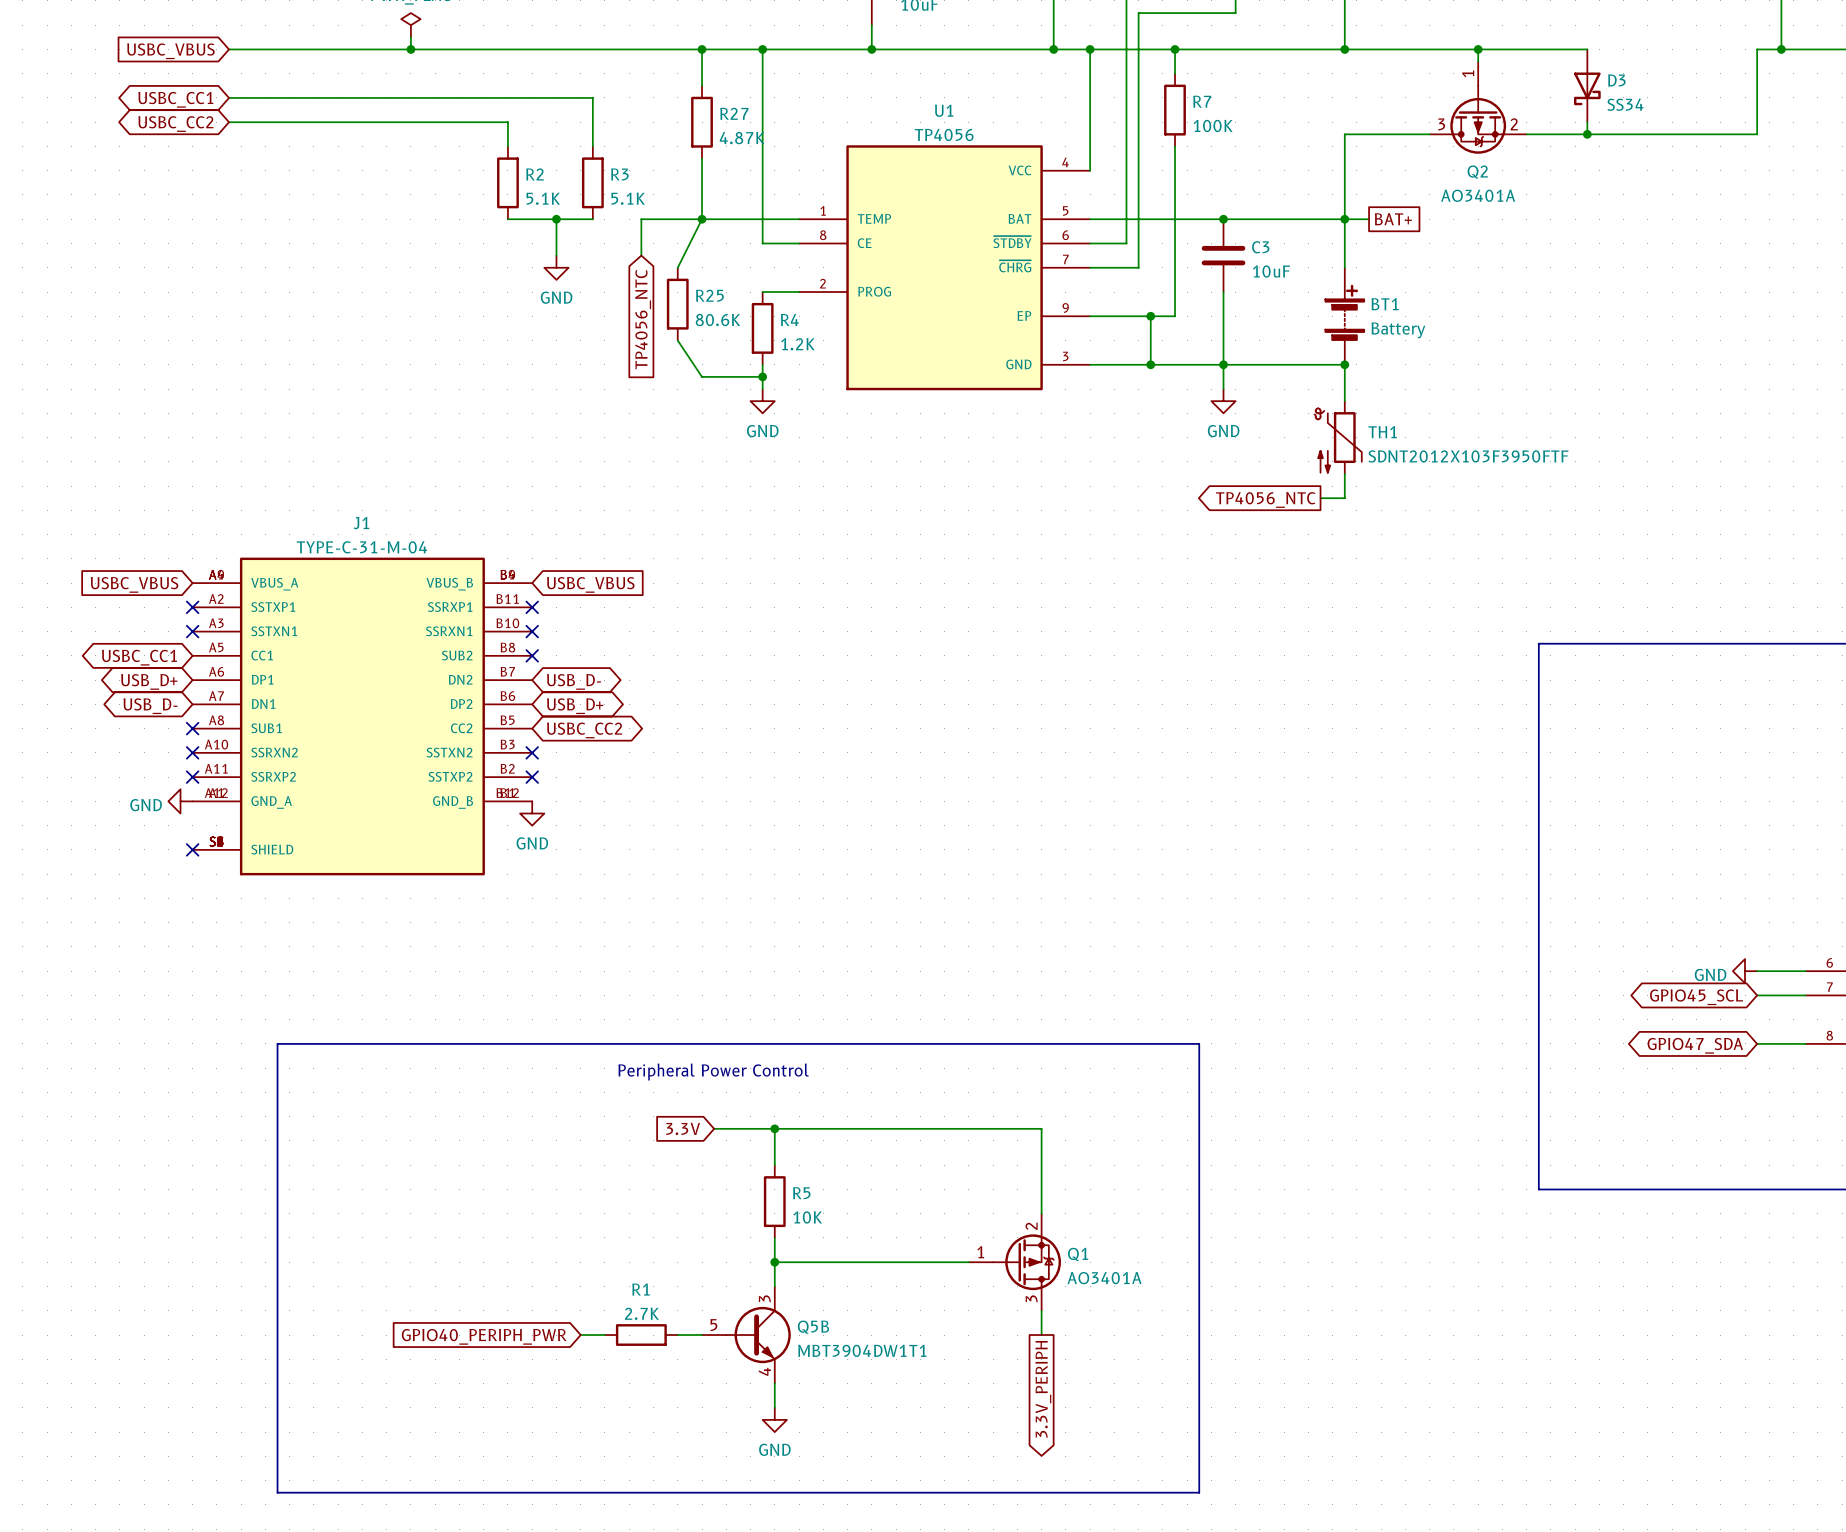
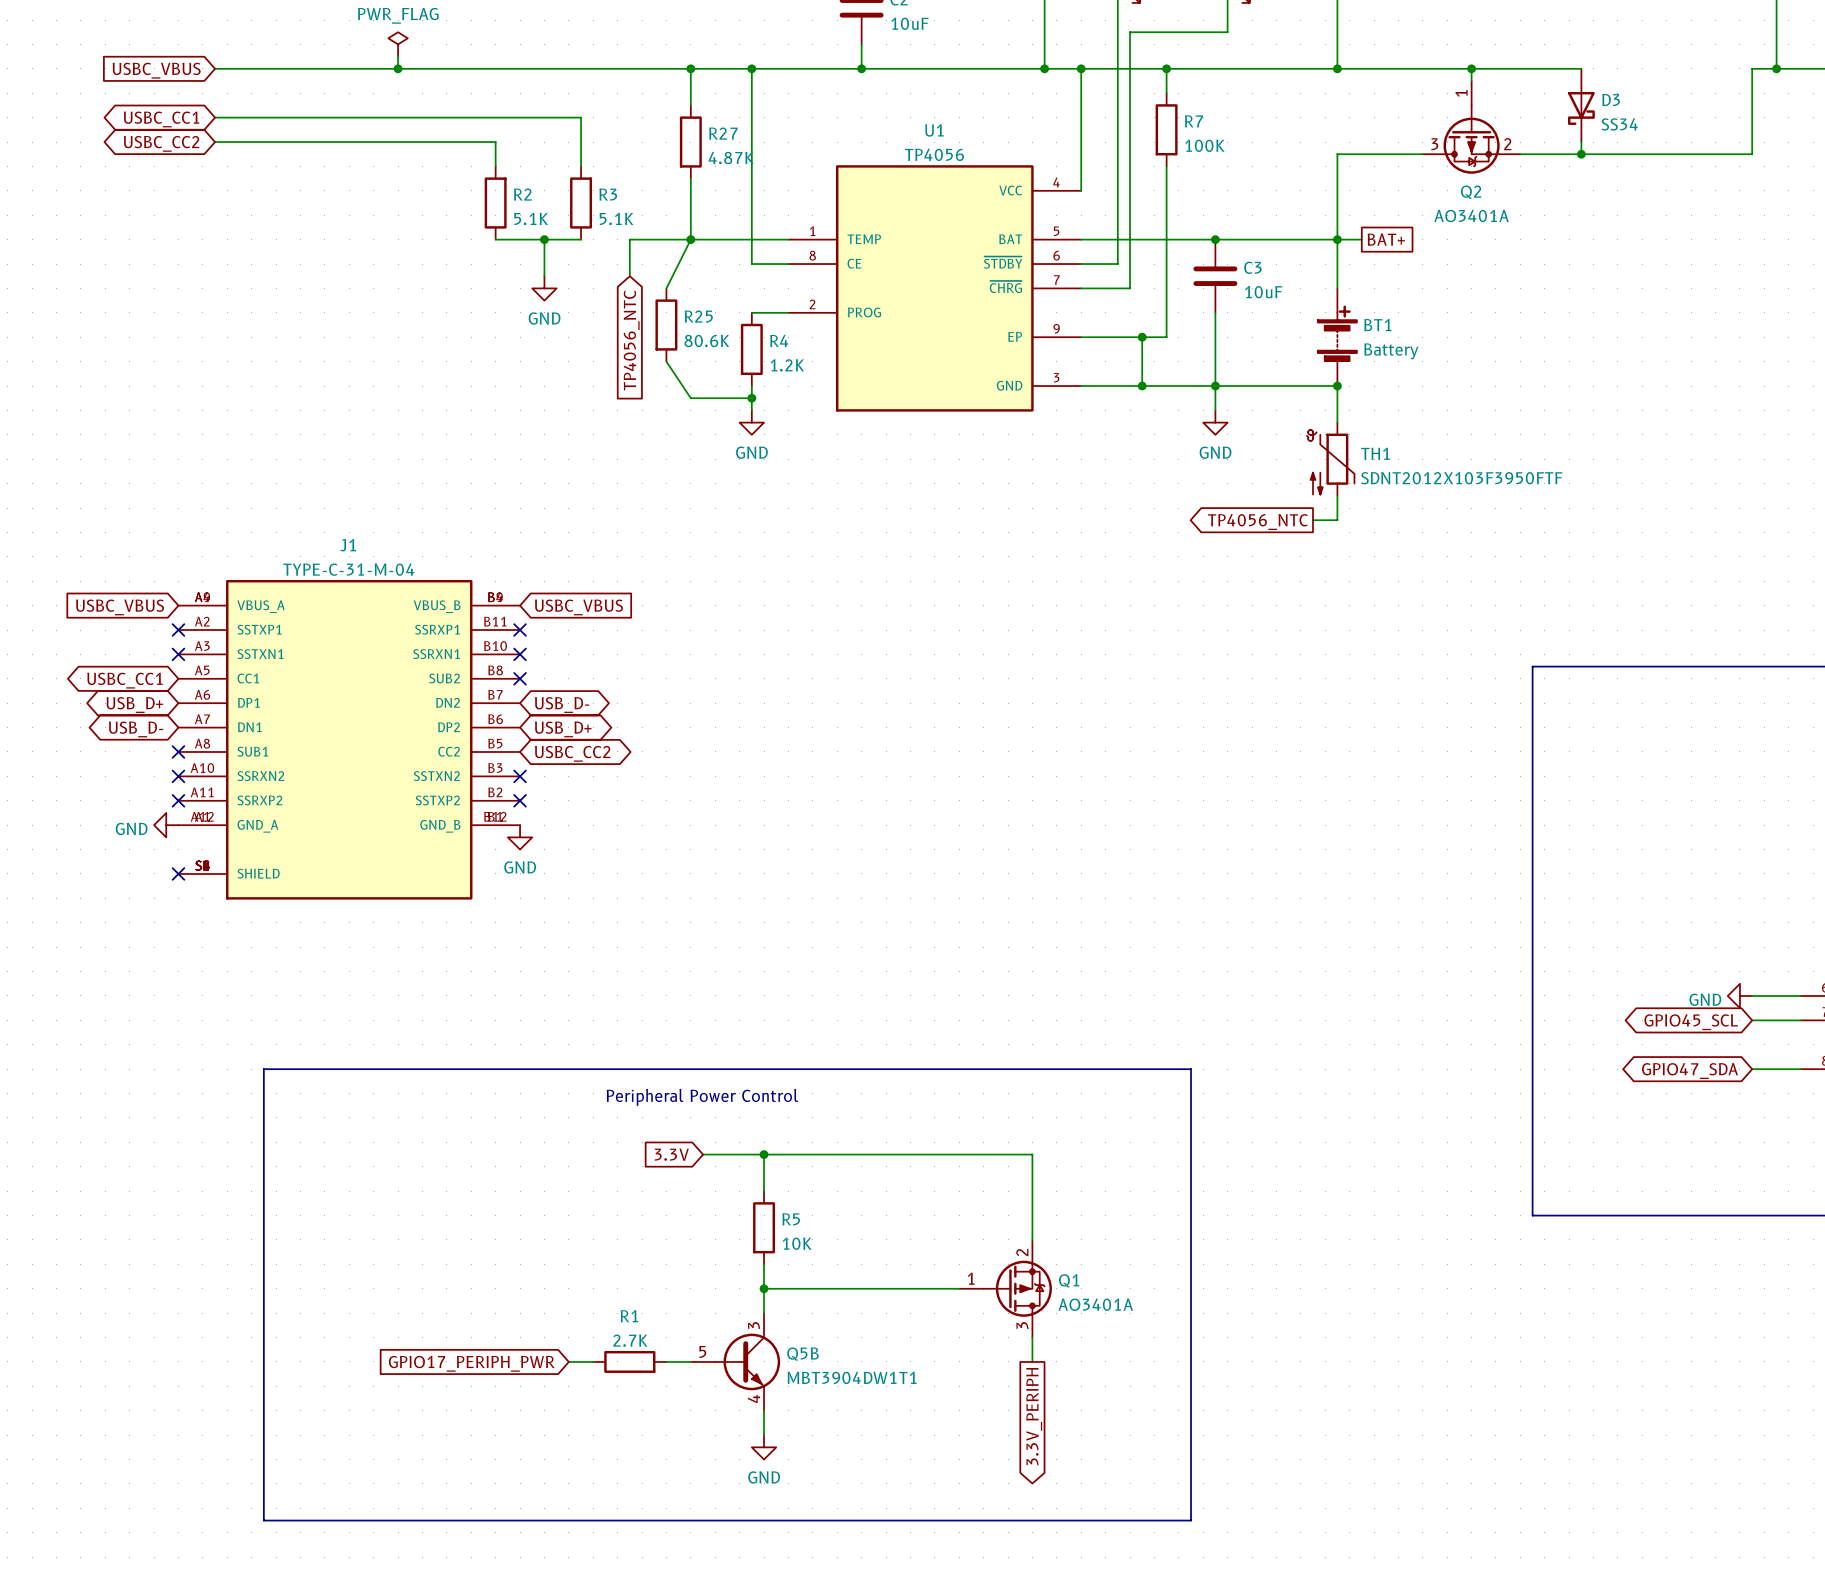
global label: GPIO40_PERIPH_PWR (484, 1336) -> GPIO17_PERIPH_PWR (471, 1363)

